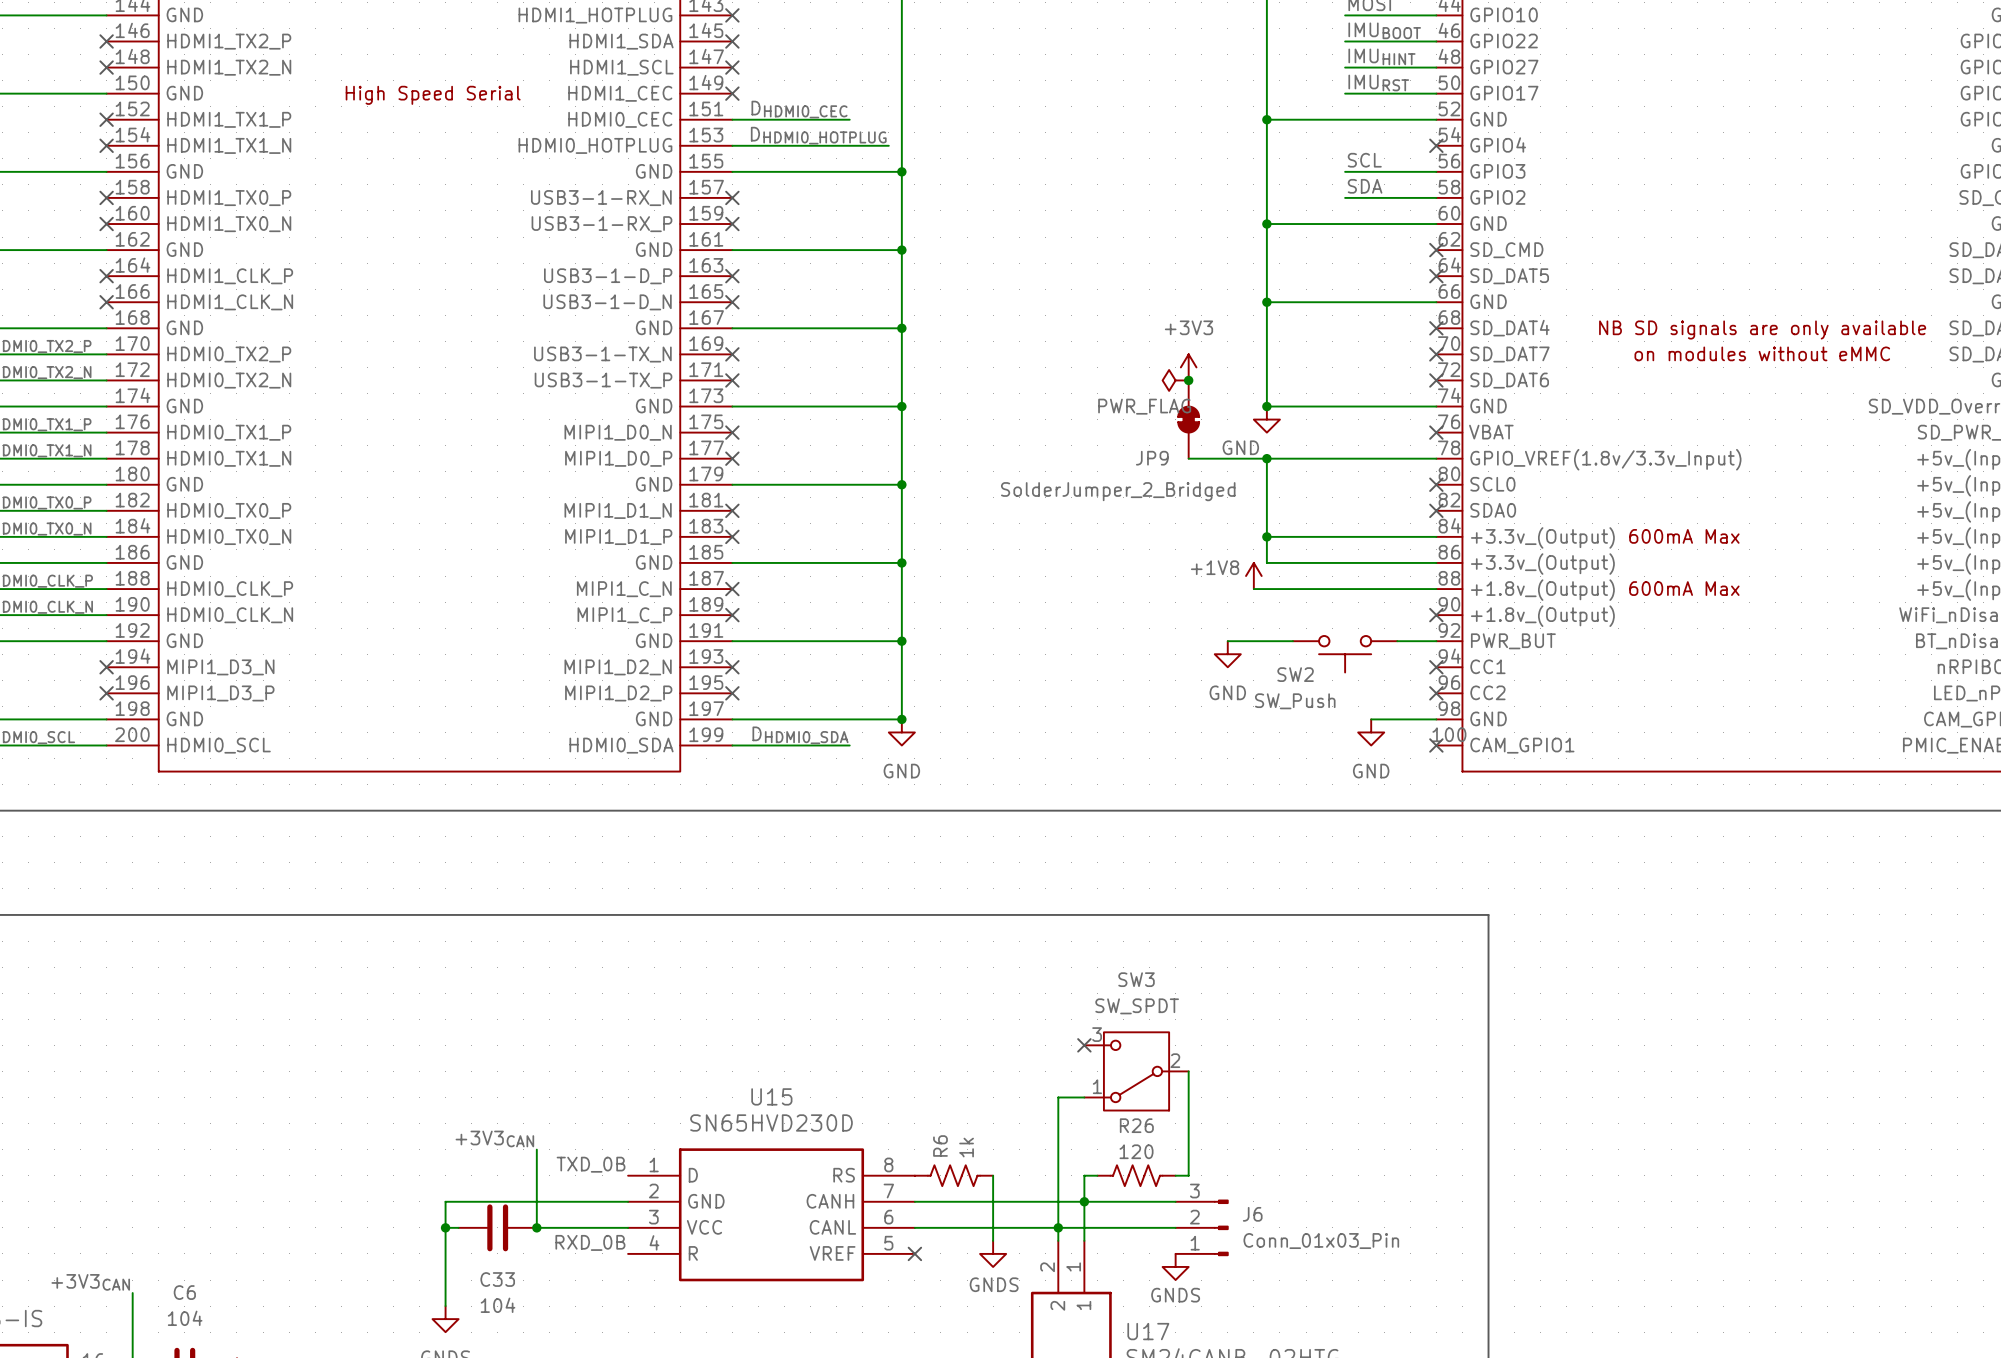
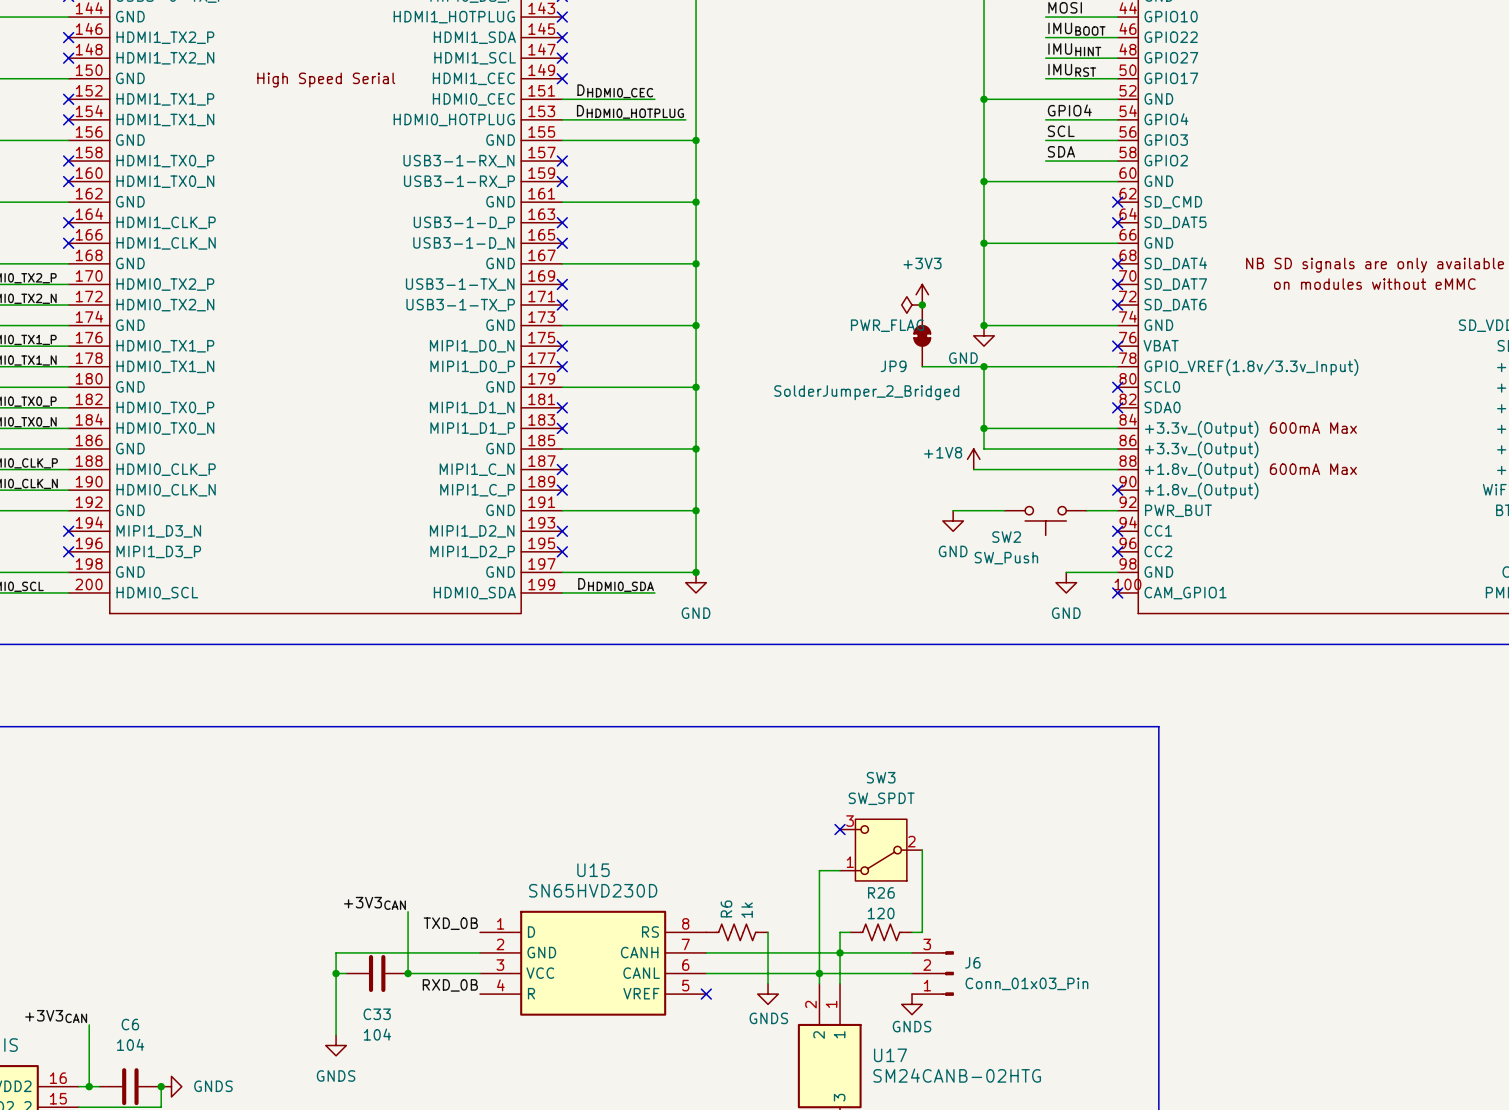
label: none -> GPIO4 (1069, 110)
wire: none -> (1045, 119) (1117, 119)
no-connect mark: (1436, 145) -> none

